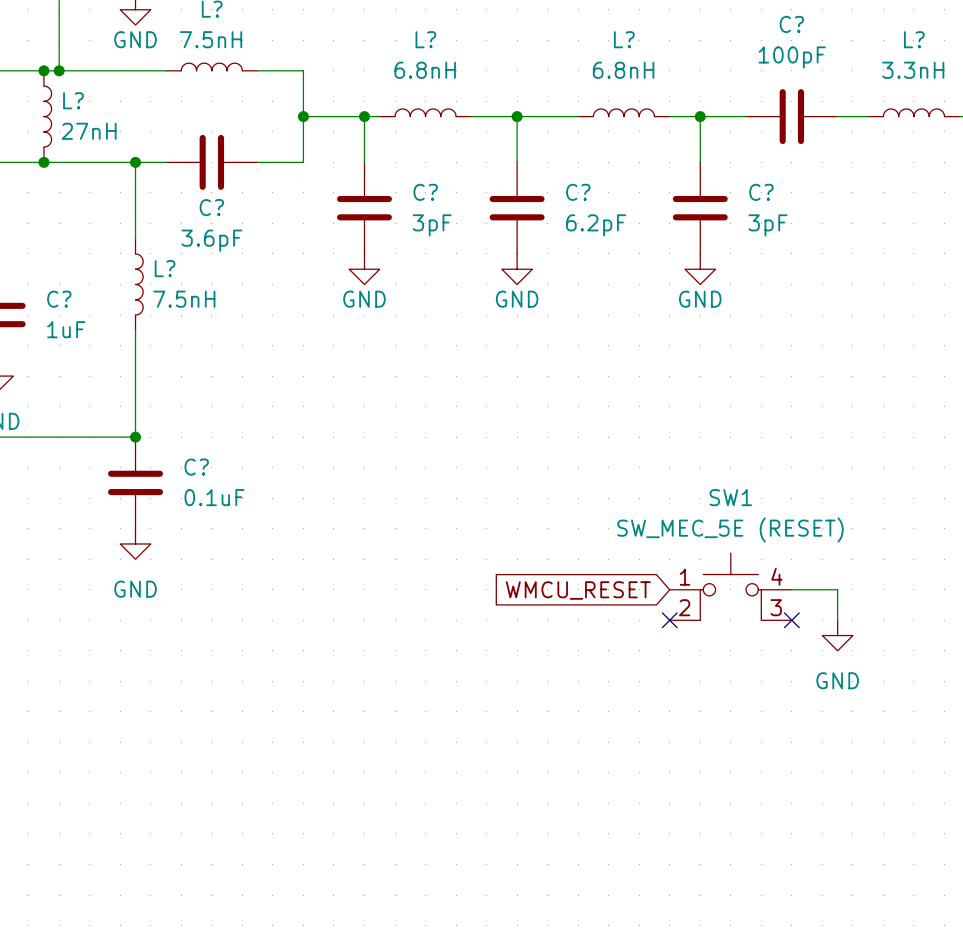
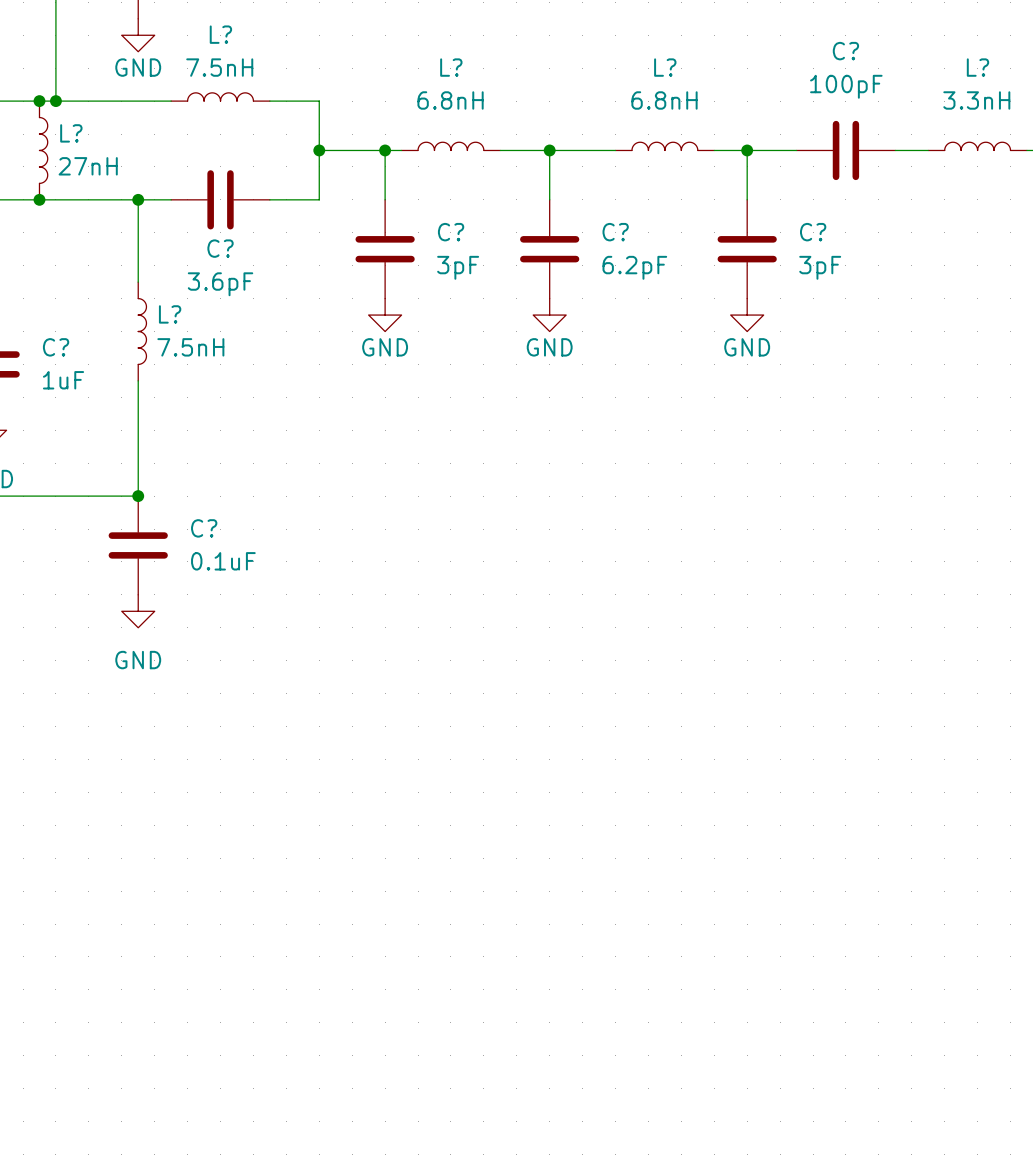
SW1: SW_MEC_5E (RESET) (730, 586) -> none
wire: (791, 589) (837, 589) (837, 620) -> none
global label: WMCU_RESET (578, 590) -> none
no-connect mark: (669, 620) -> none
no-connect mark: (791, 620) -> none
power symbol: GND (837, 635) -> none

